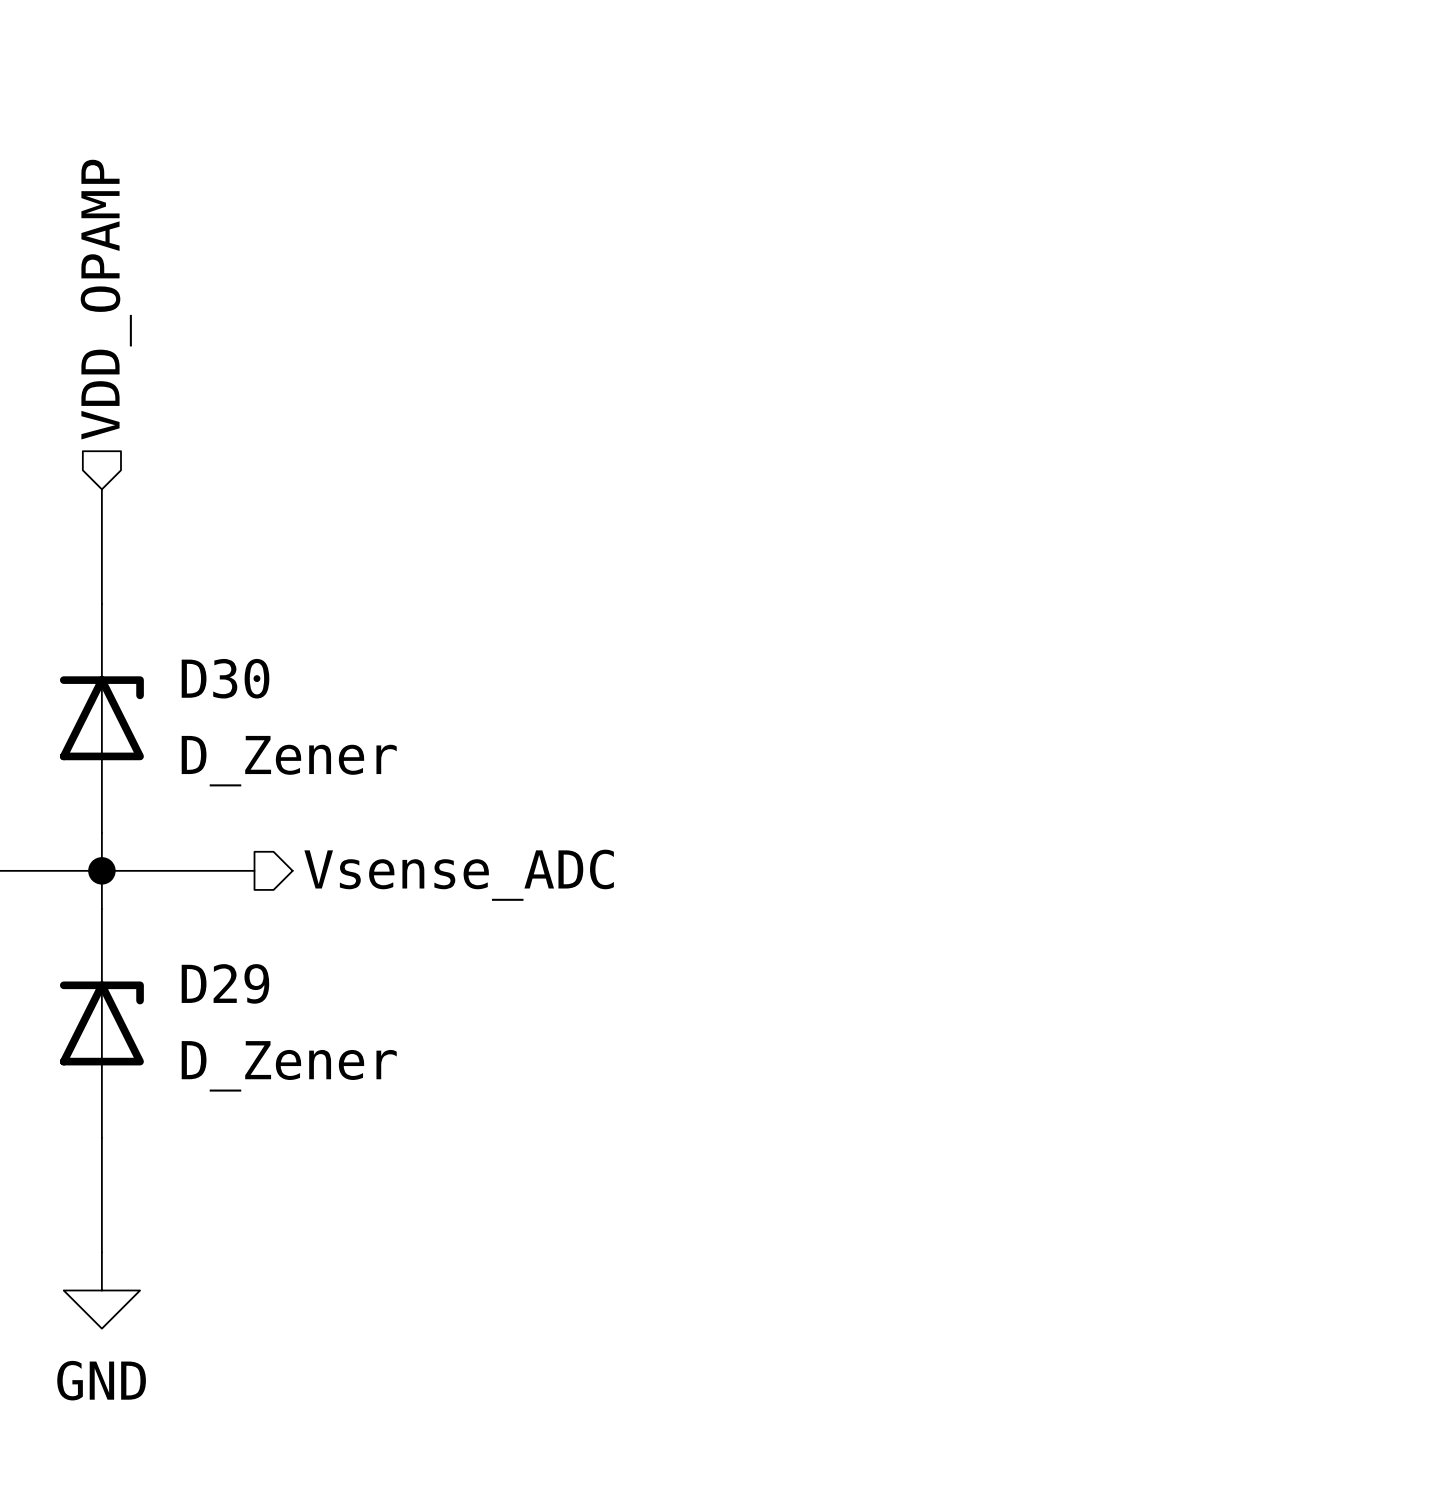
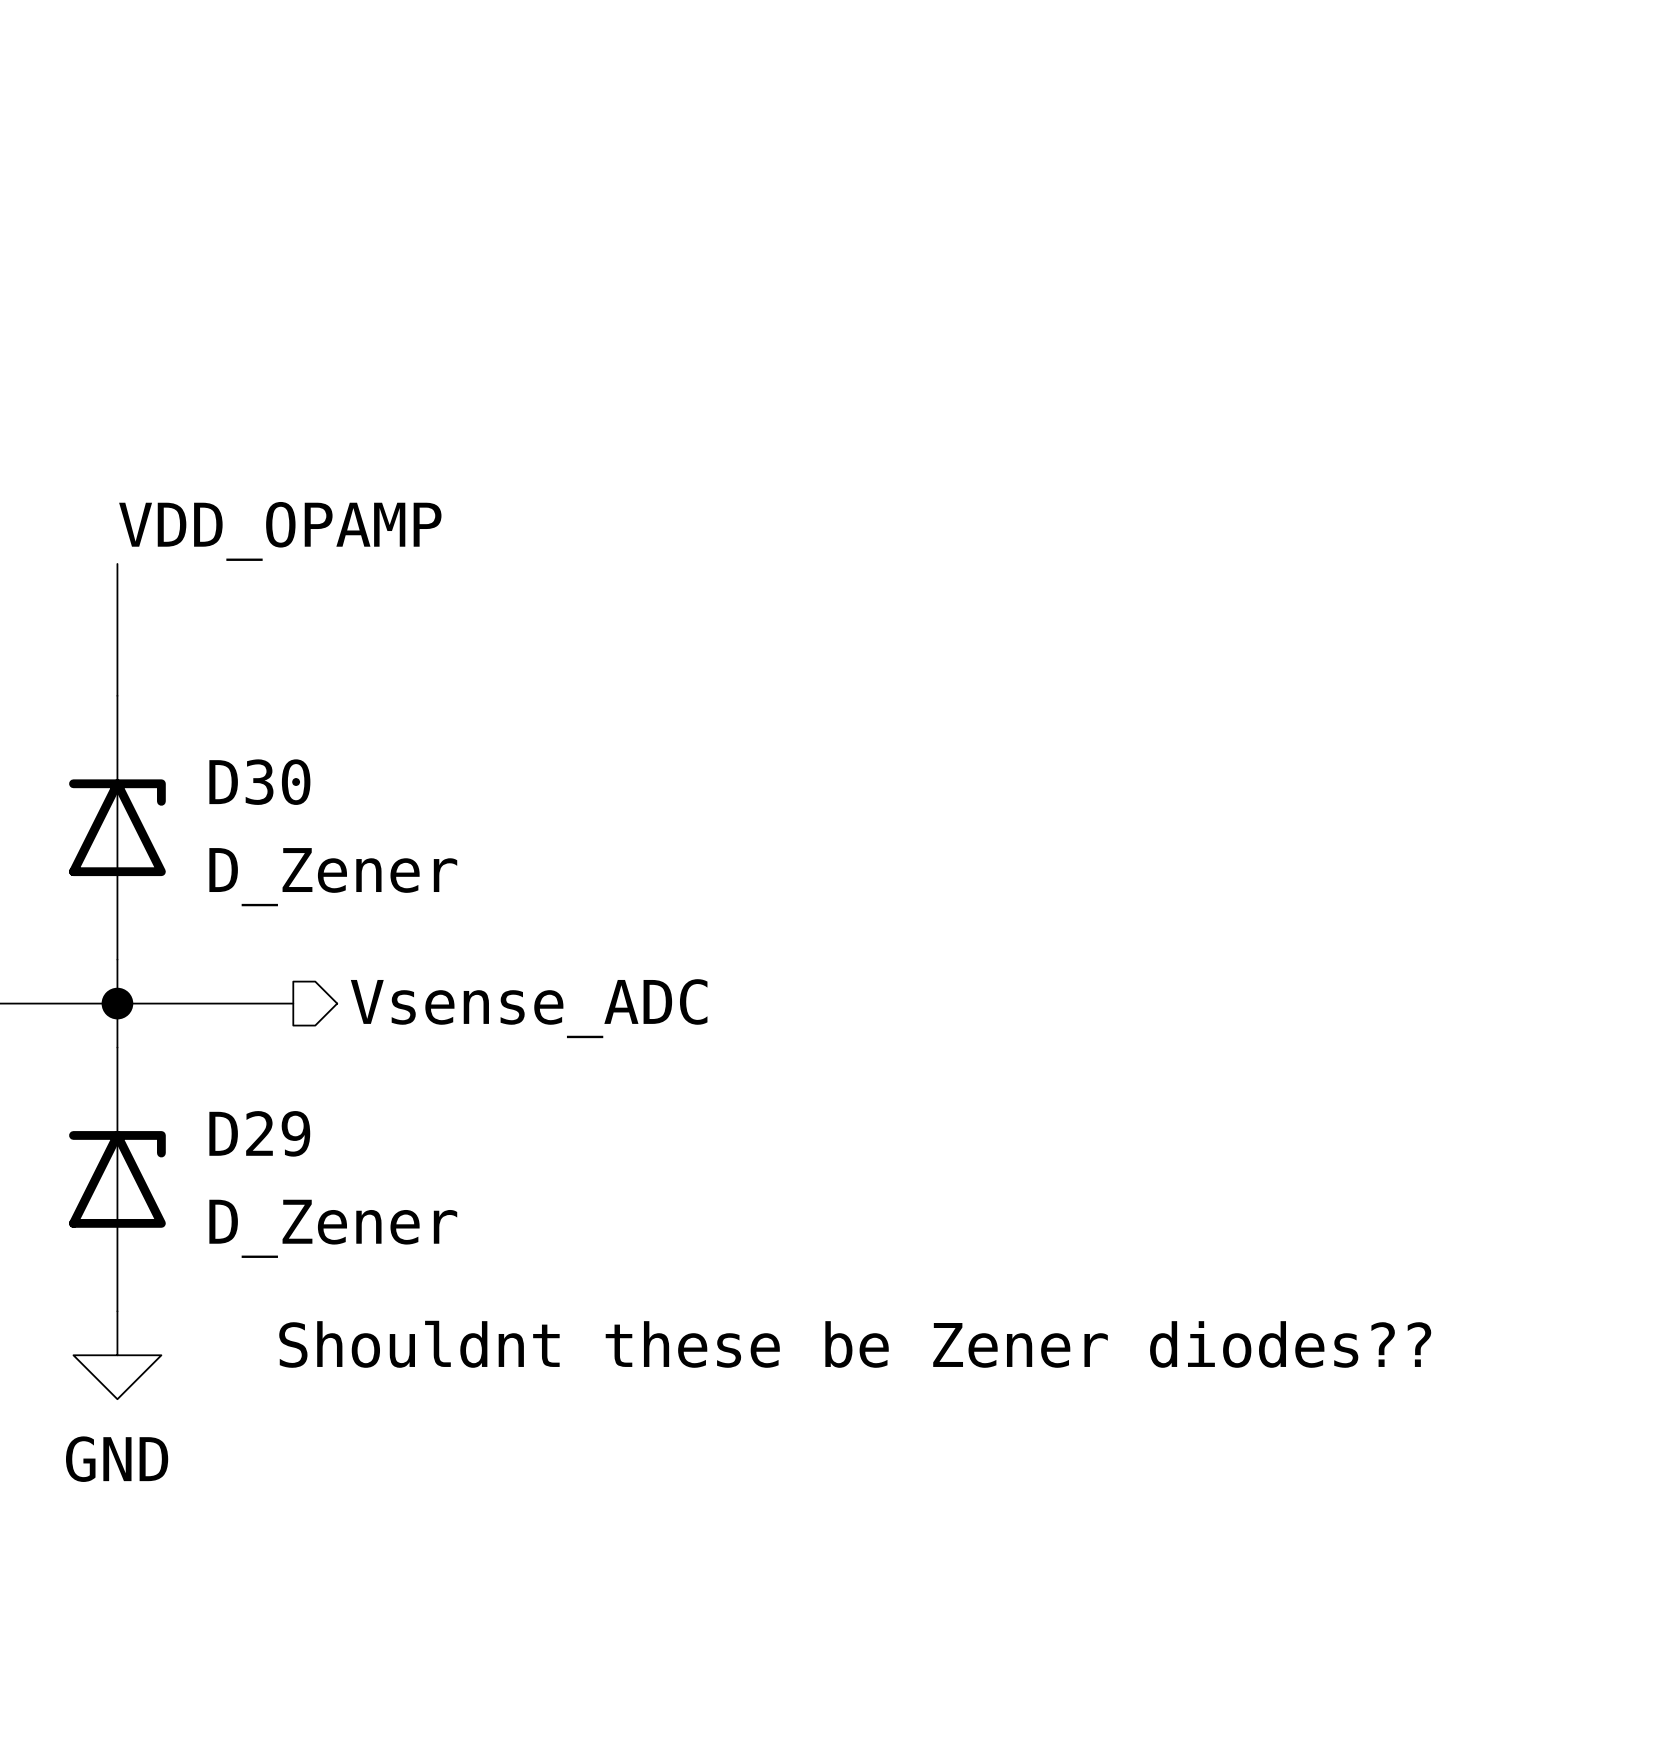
hierarchical label: VDD_OPAMP (106, 299) -> none
label: none -> VDD_OPAMP (280, 531)
wire: (101, 1137) (101, 1252) -> none
text: none -> Shouldnt these be Zener diodes?? (855, 1344)
power symbol position: GND (101, 1290) -> GND (117, 1355)

